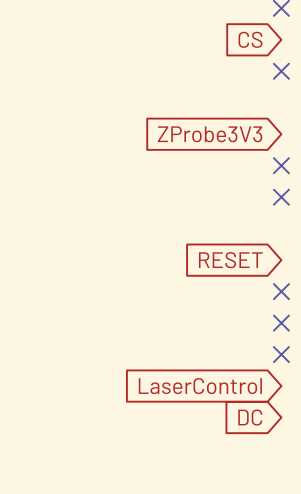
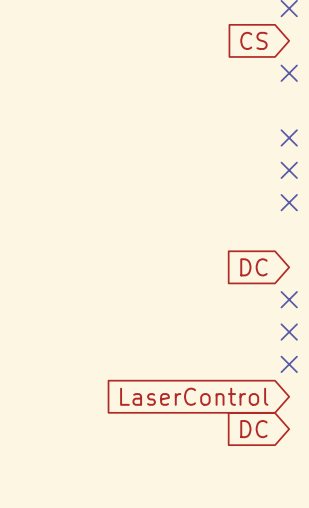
global label: ZProbe3V3 (210, 134) -> none
no-connect mark: none -> (289, 137)
global label: RESET (230, 260) -> DC (253, 267)

